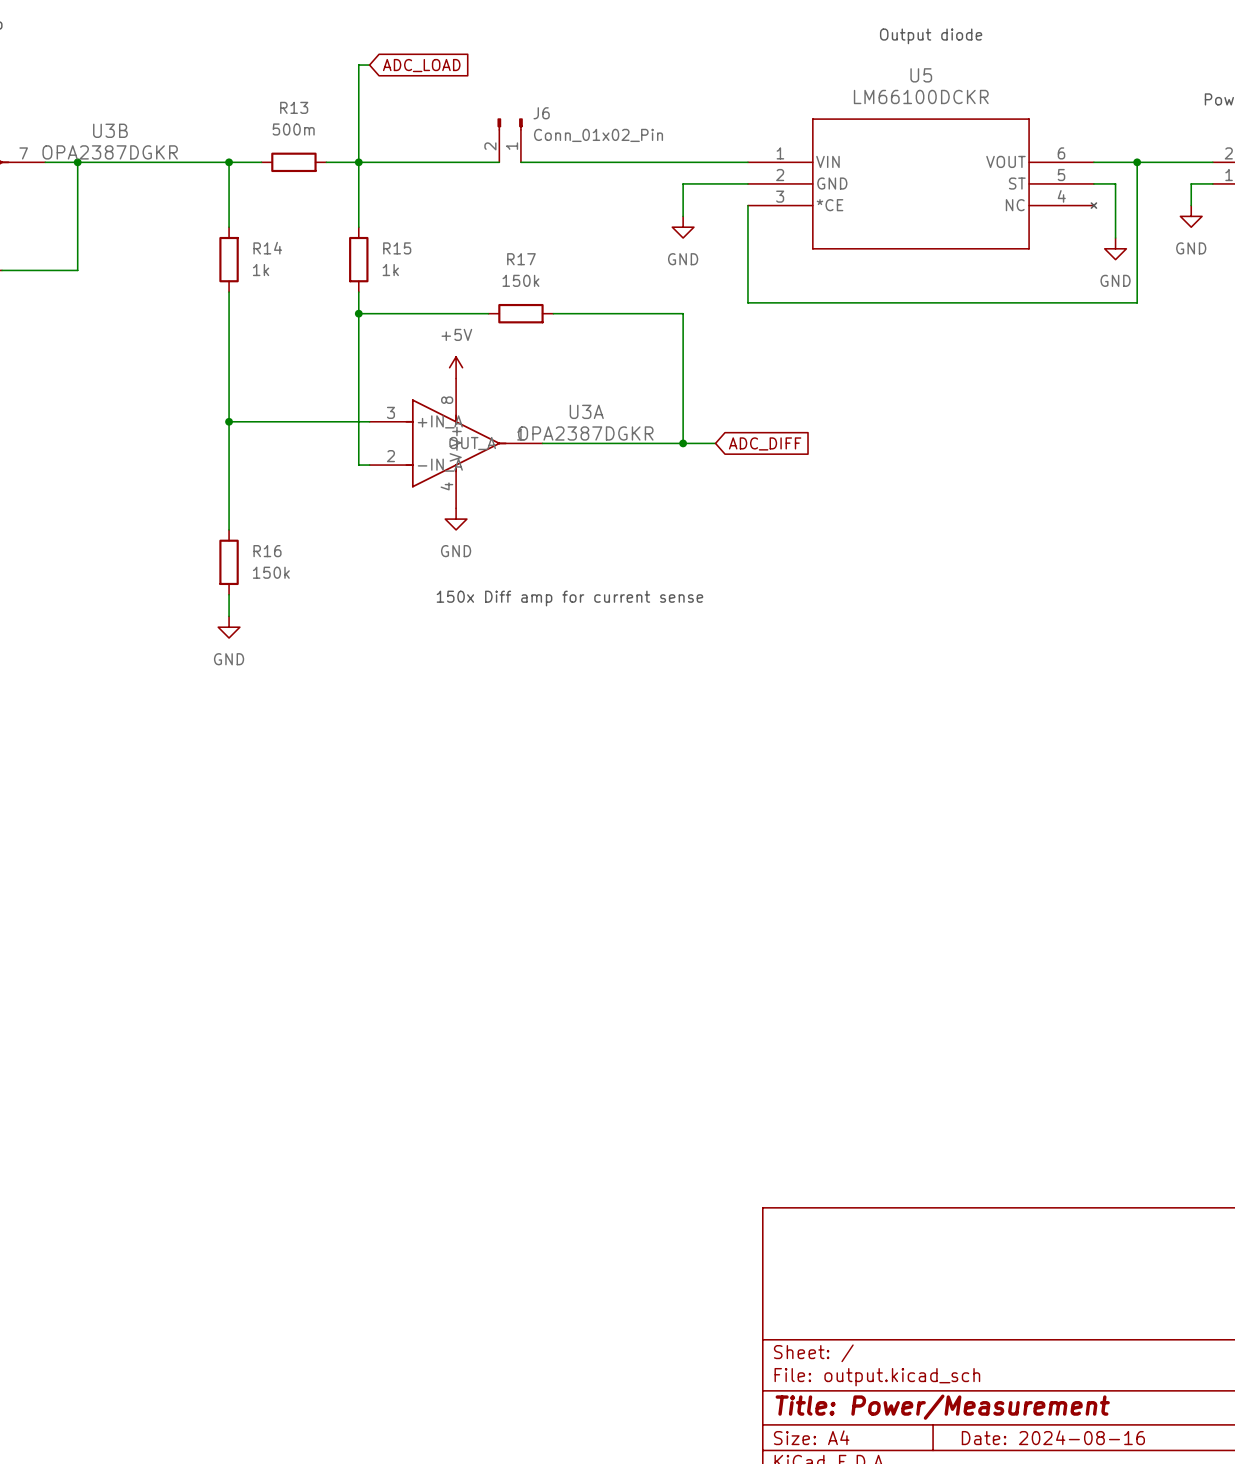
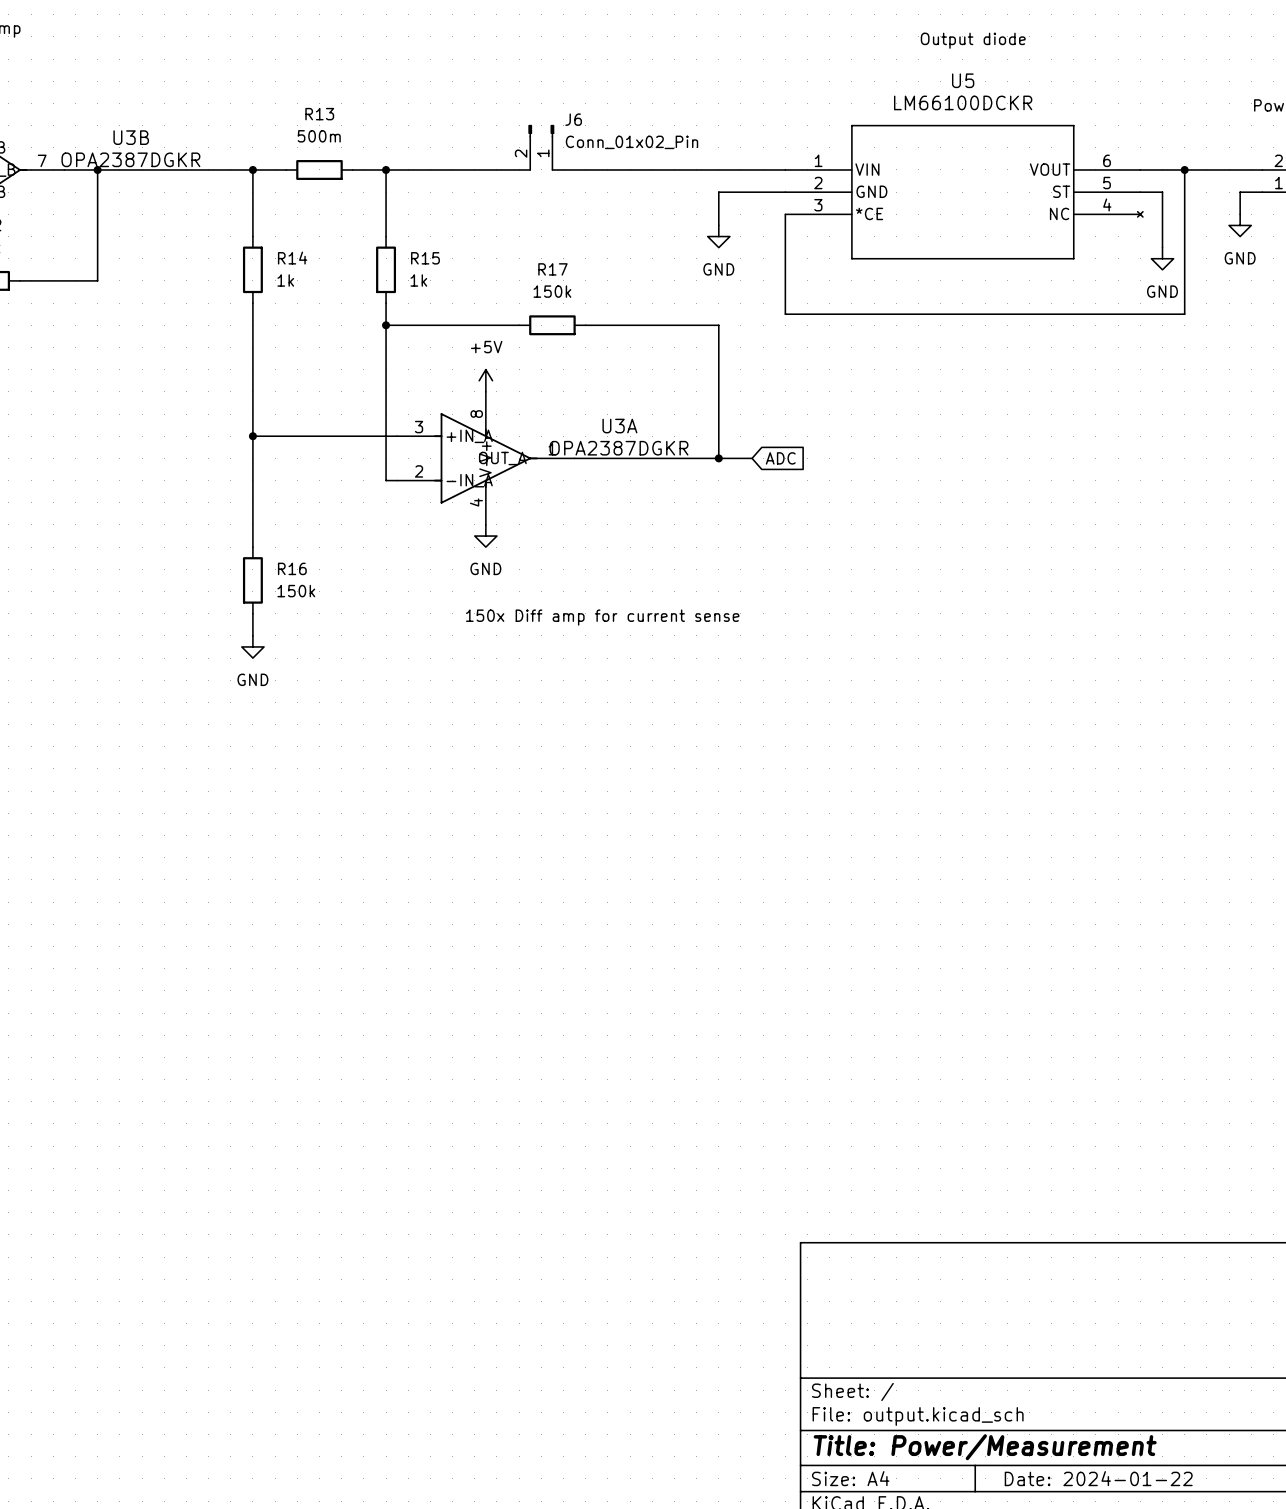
wire: (369, 65) (358, 65) (358, 162) -> none
global label: ADC_LOAD (421, 65) -> none
global label: ADC_DIFF (765, 443) -> ADC (780, 458)
title block: Date: 2024-08-16 (1053, 1437) -> Date: 2024-01-22 (1098, 1478)

